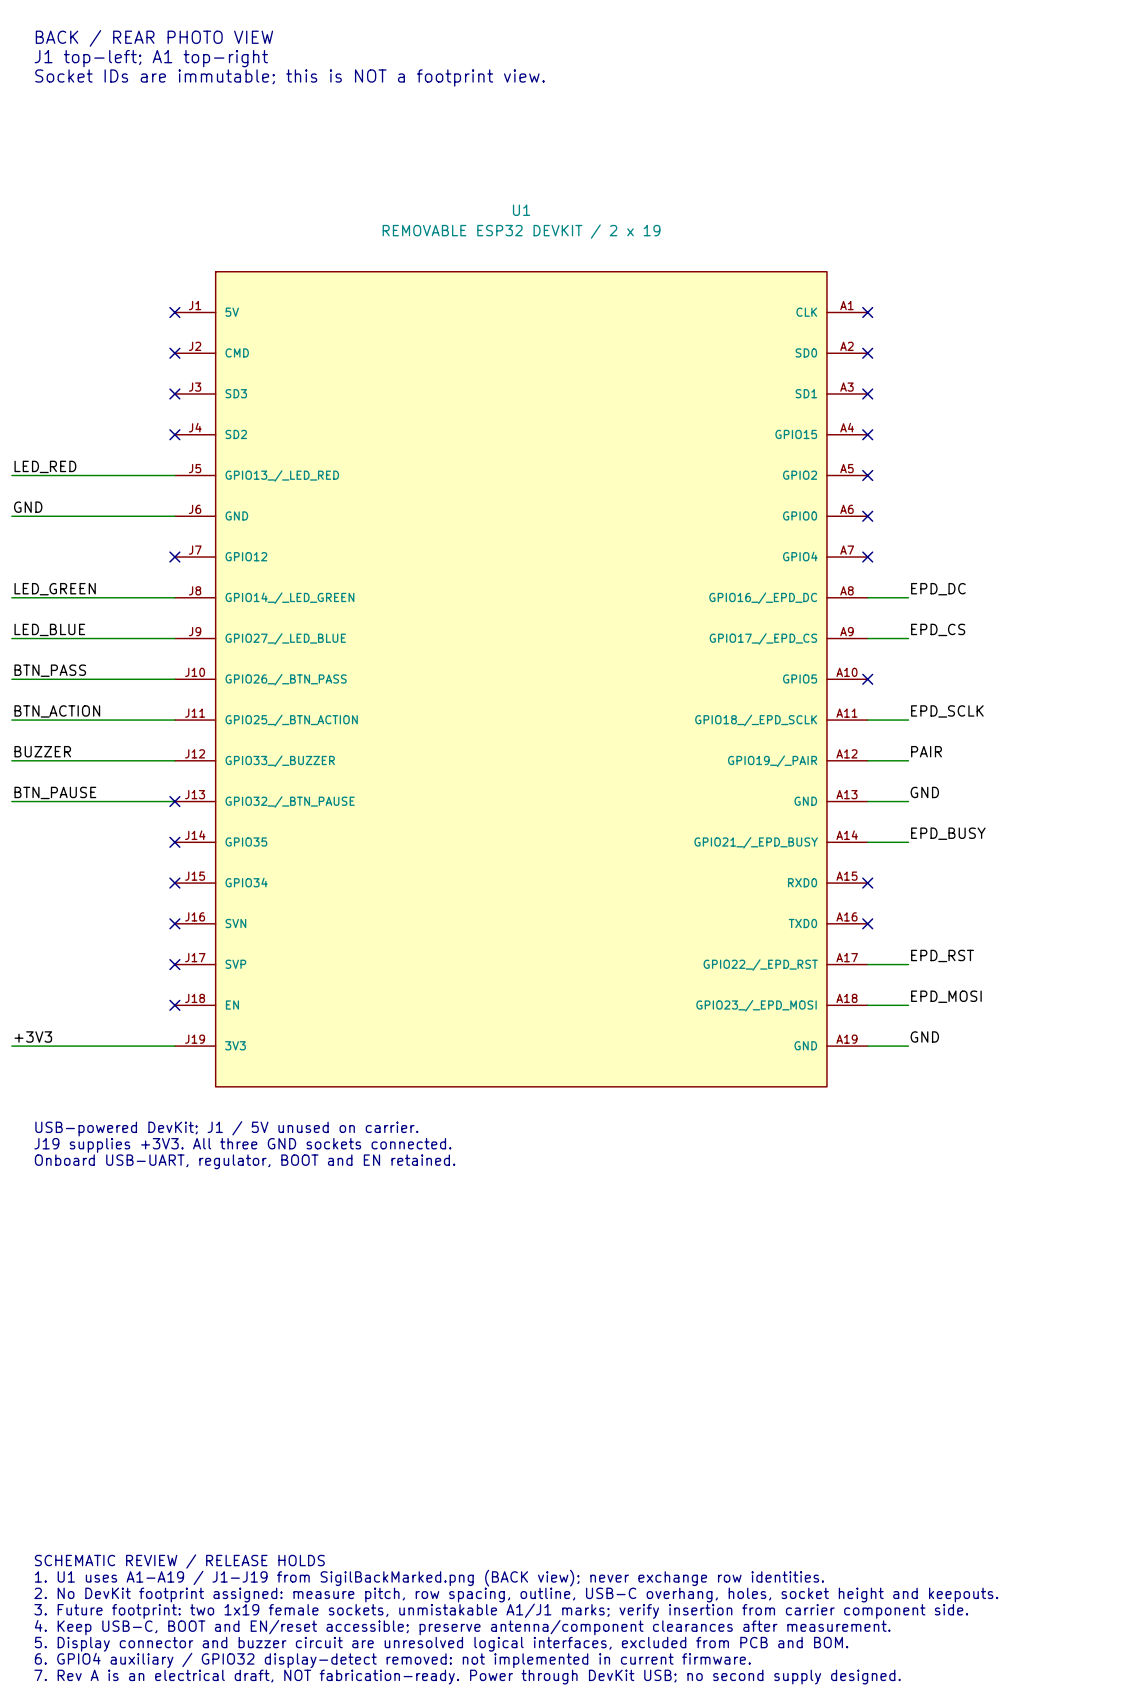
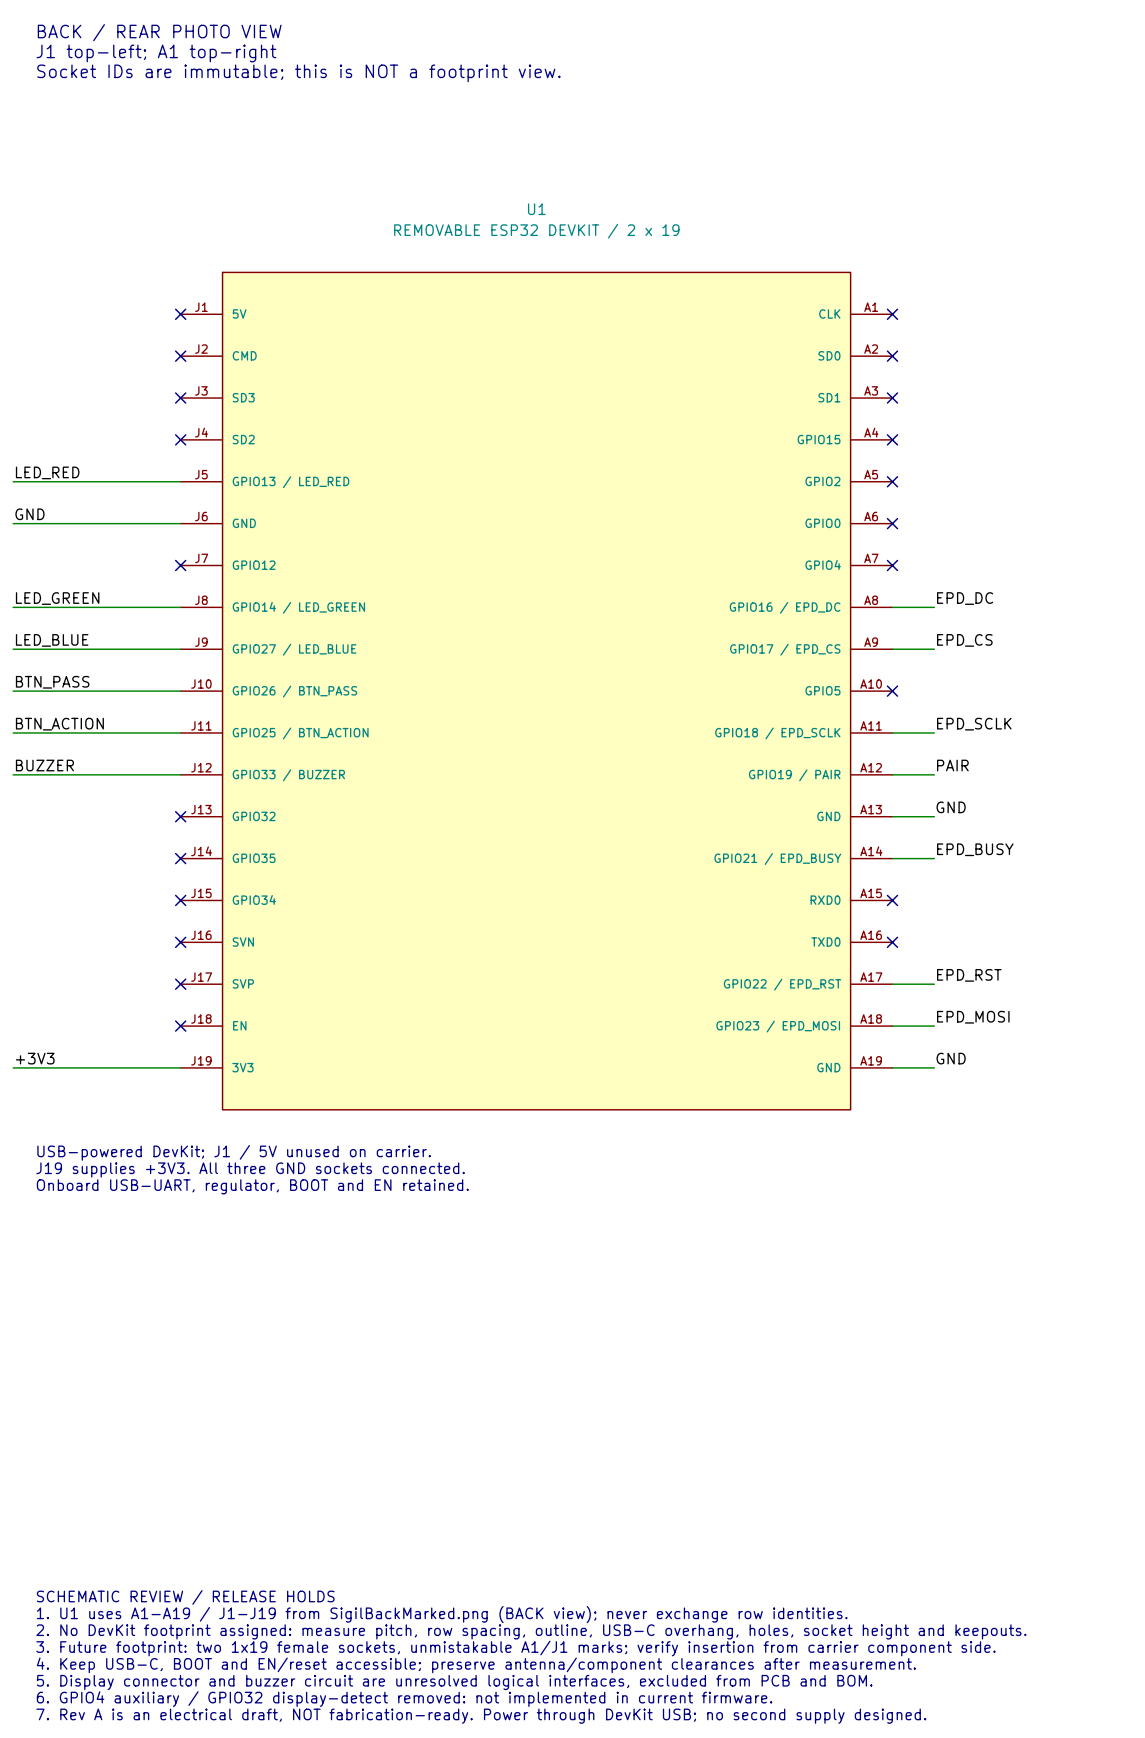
U1 symbol: [174, 271, 868, 1087] -> [180, 272, 893, 1110]
label: BTN_PAUSE (55, 792) -> none
wire: (11, 801) (174, 801) -> none

